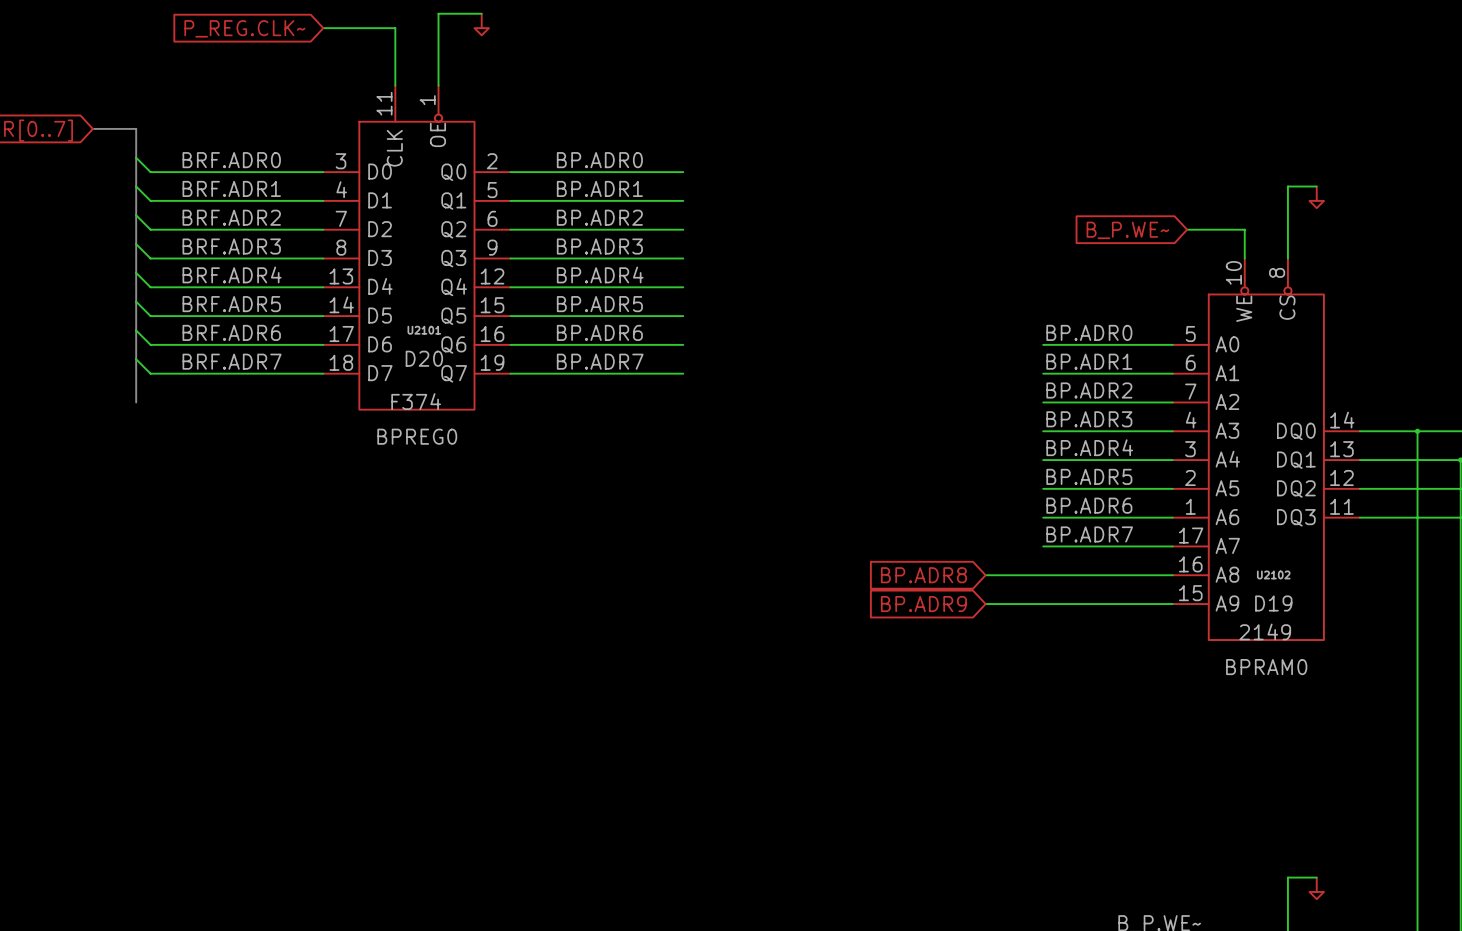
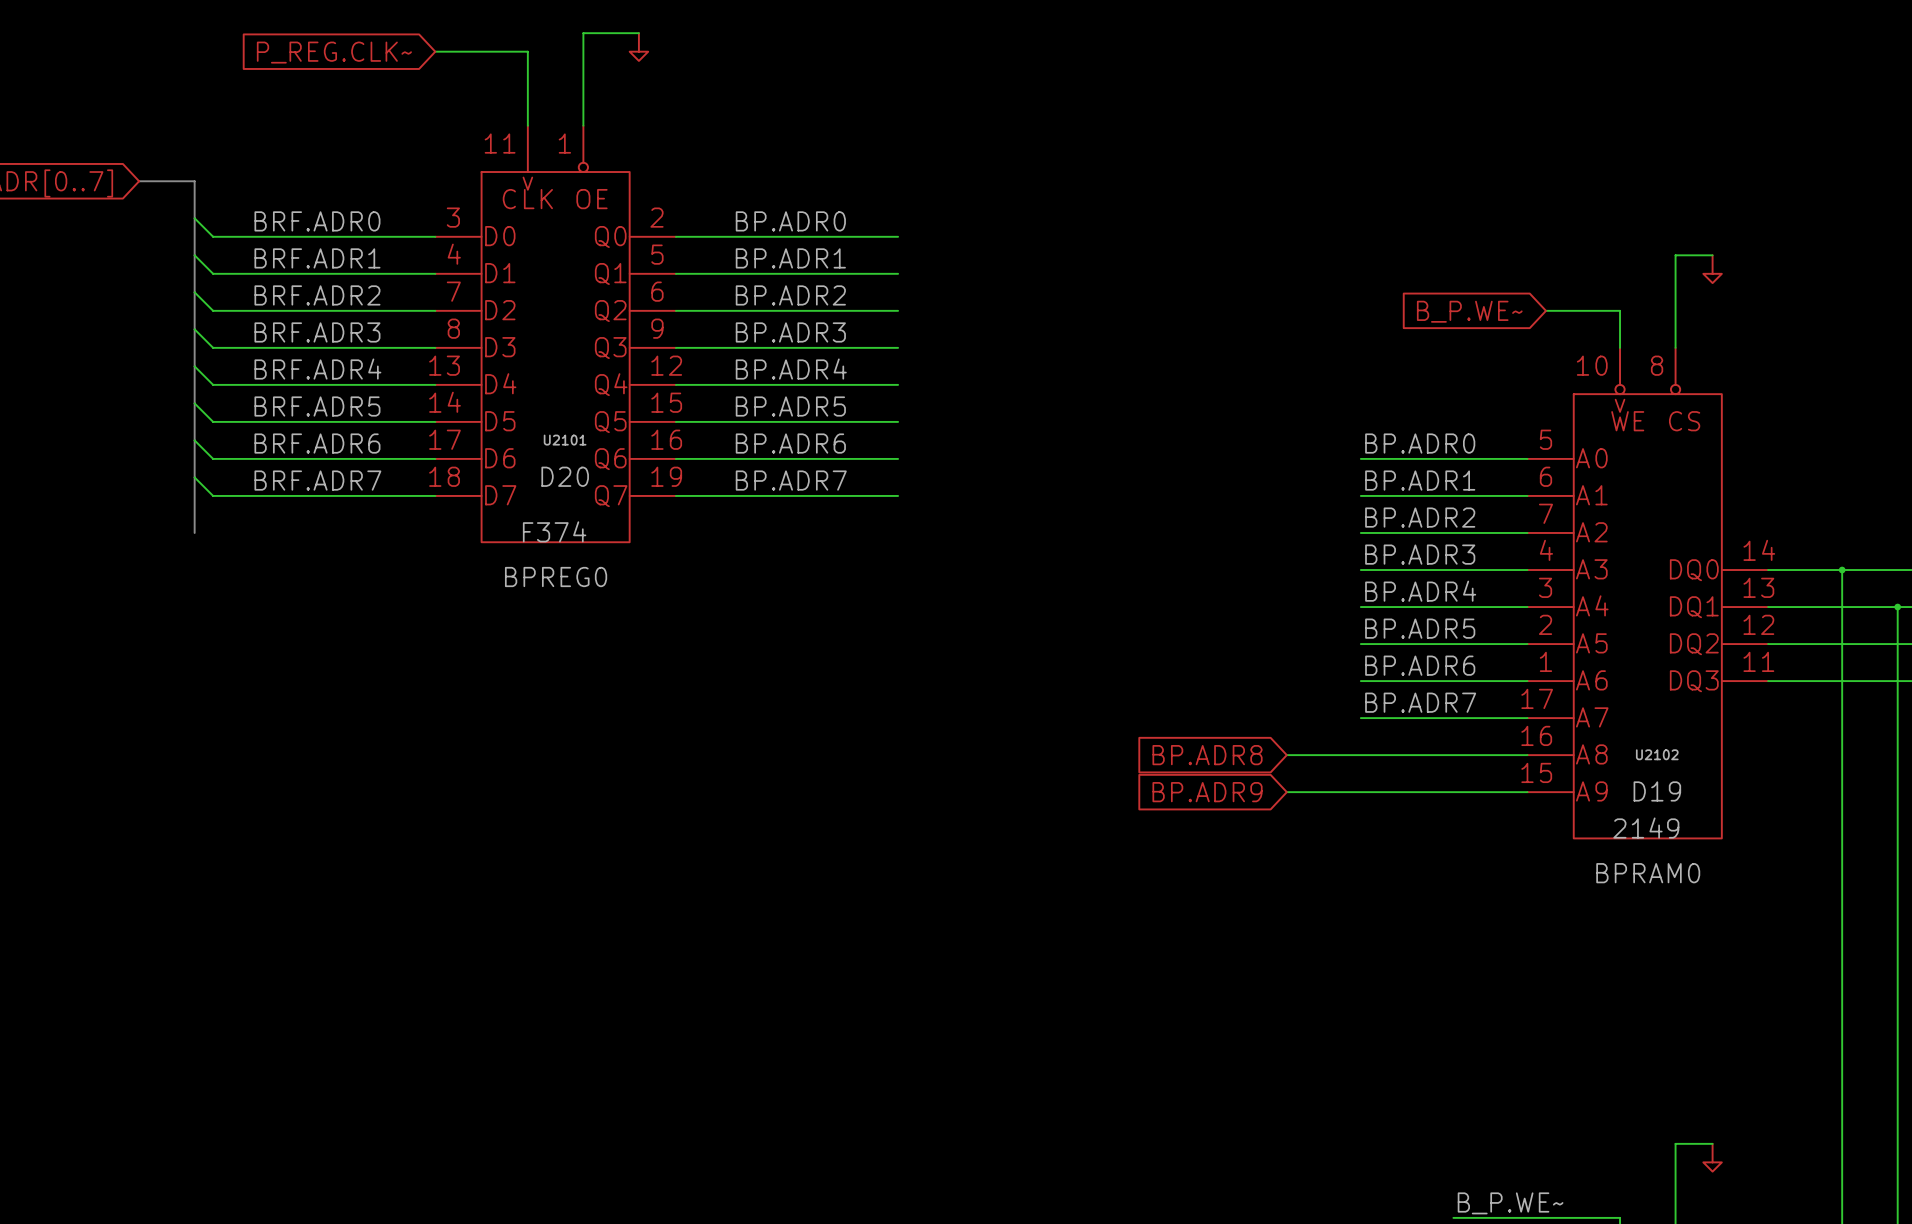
U2101 symbol: [323, 85, 511, 410] -> [435, 125, 676, 543]
U2102 symbol: [1172, 258, 1360, 641] -> [1527, 347, 1769, 839]

